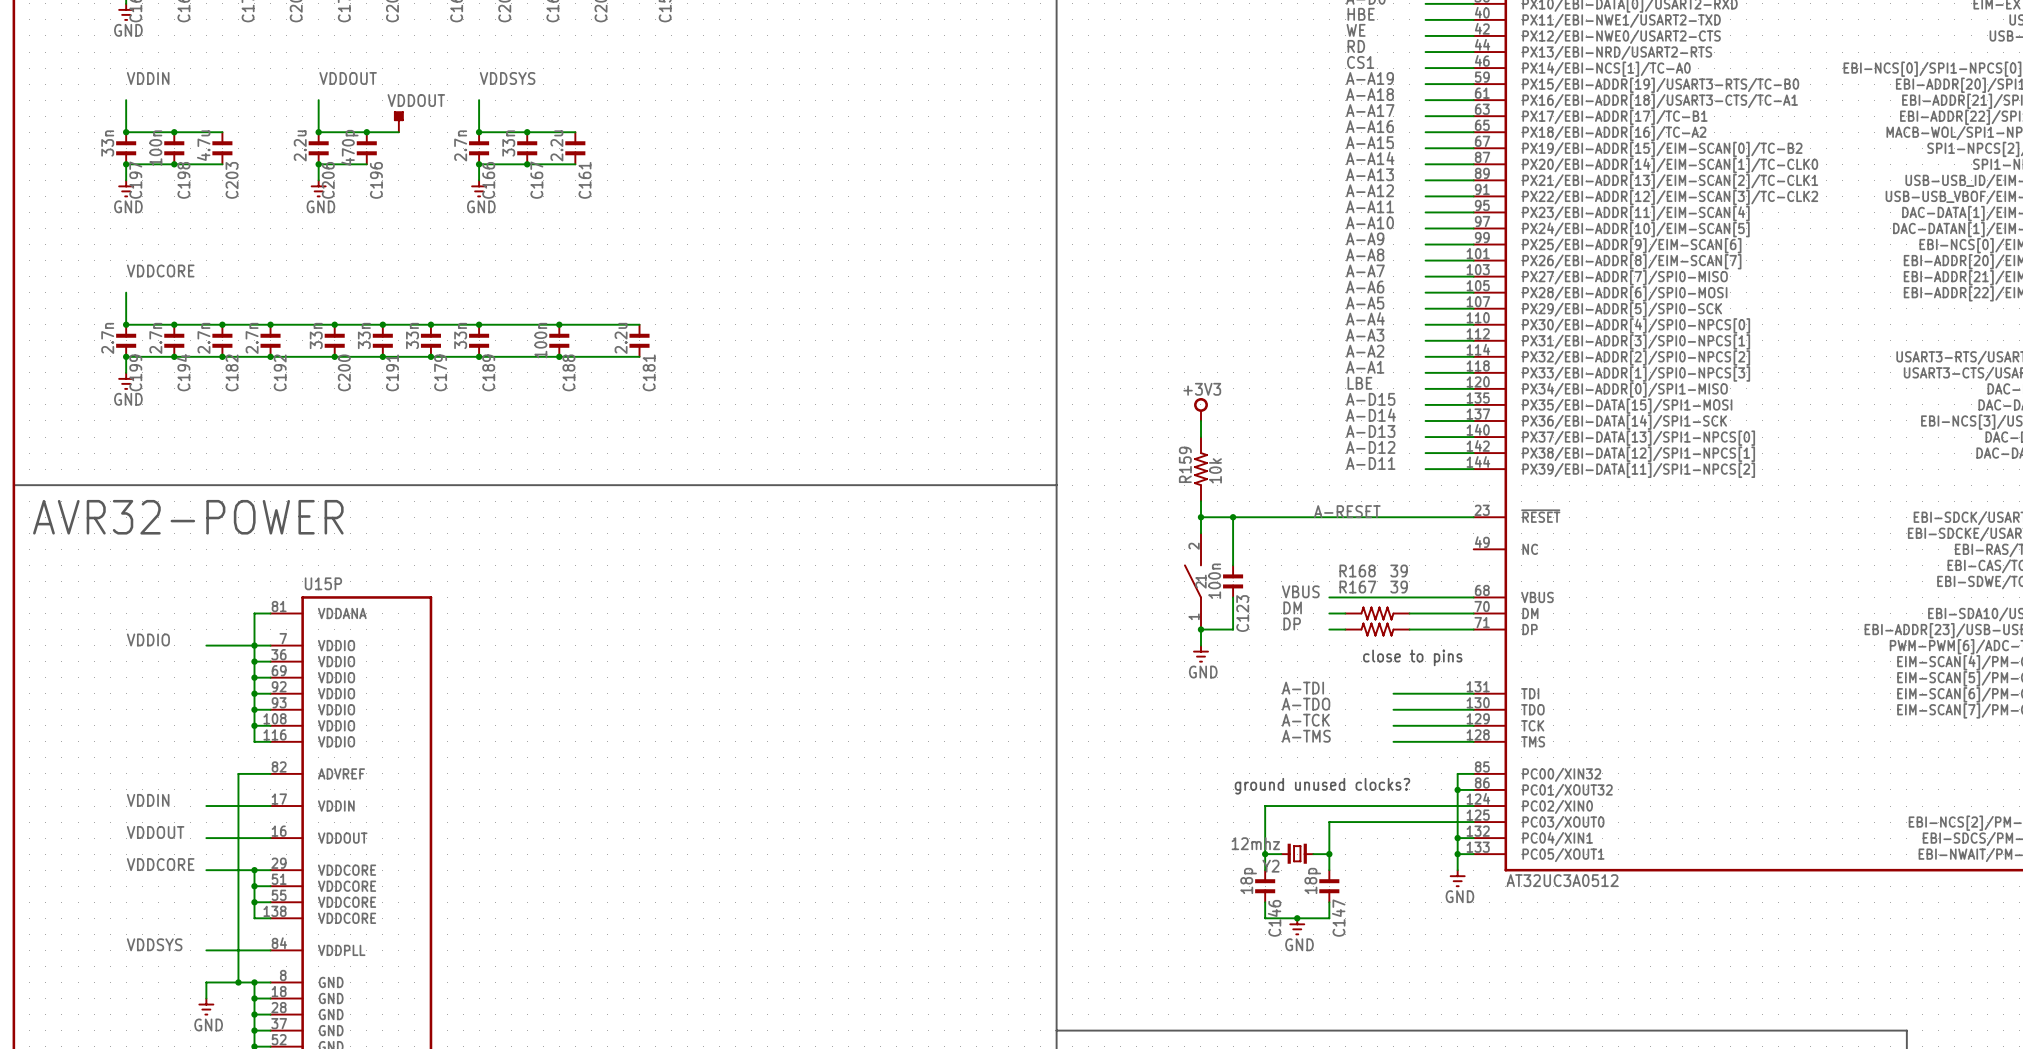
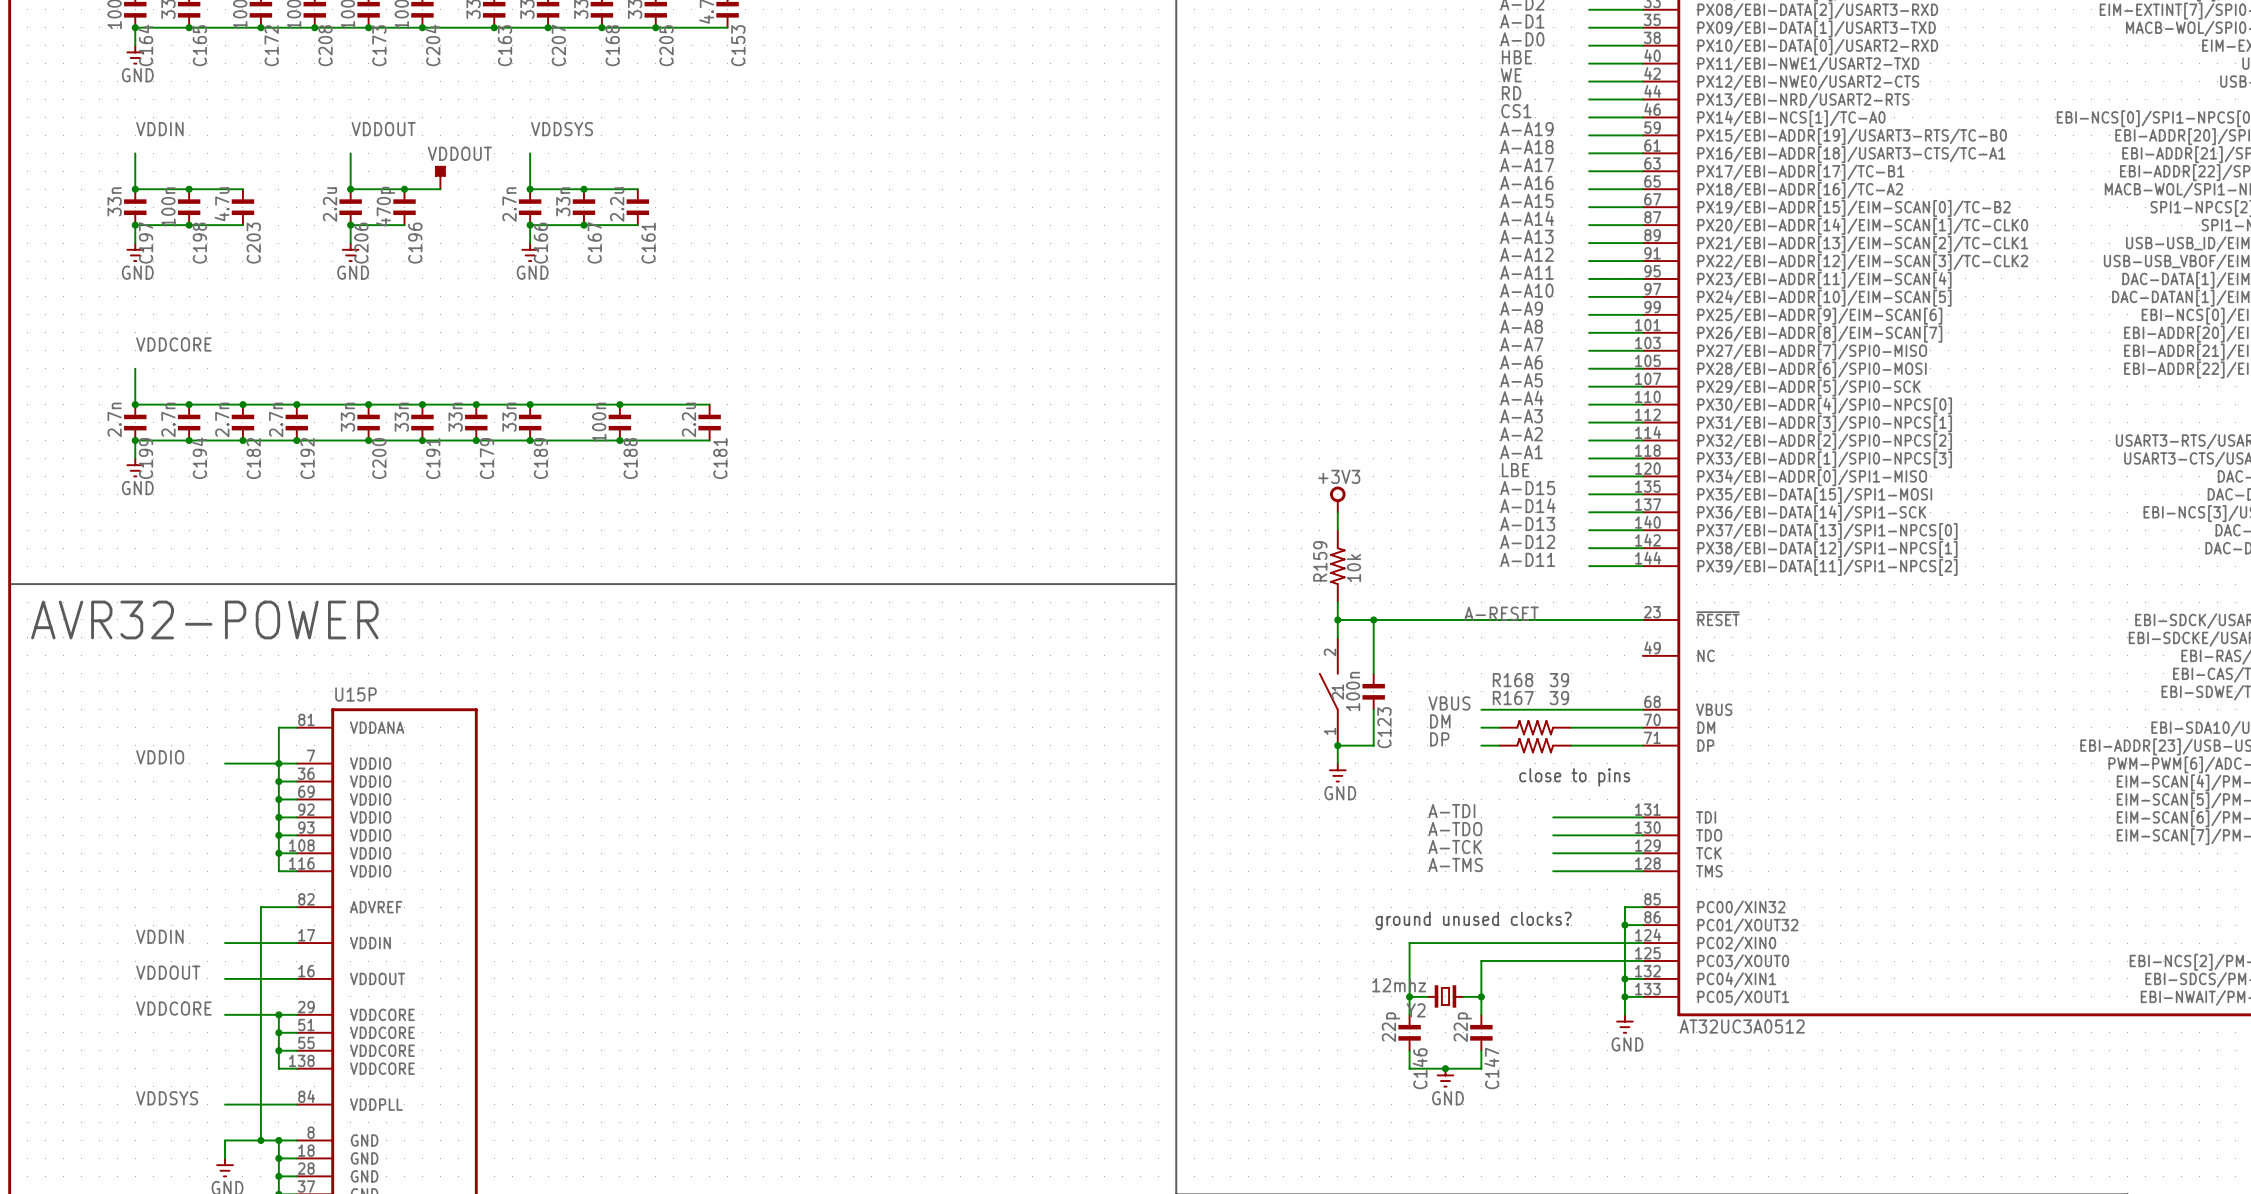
C146 value: 18p (1248, 880) -> 22p (1391, 1027)
C147 value: 18p (1312, 880) -> 22p (1462, 1027)

